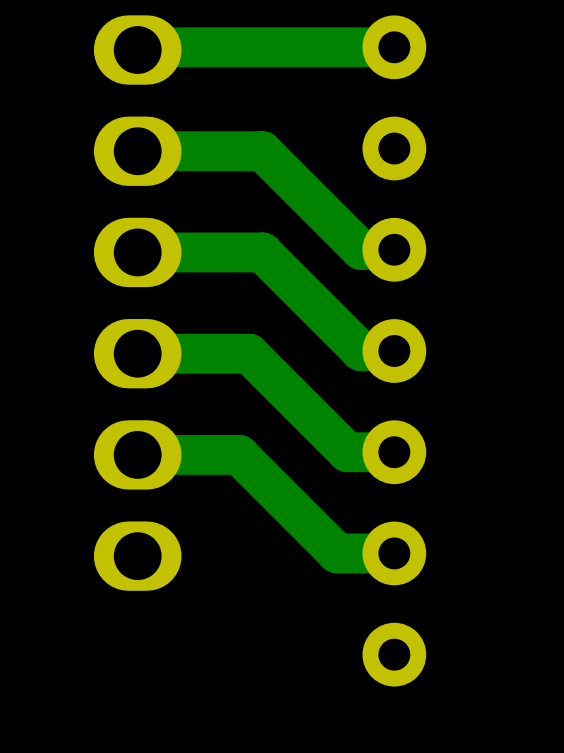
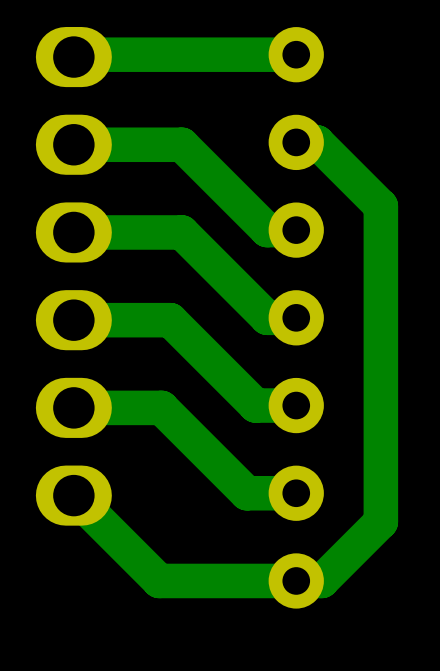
bottom track: none -> (296, 142) (317, 142) (380, 206) (380, 521) (321, 580) (159, 580) (73, 495)

